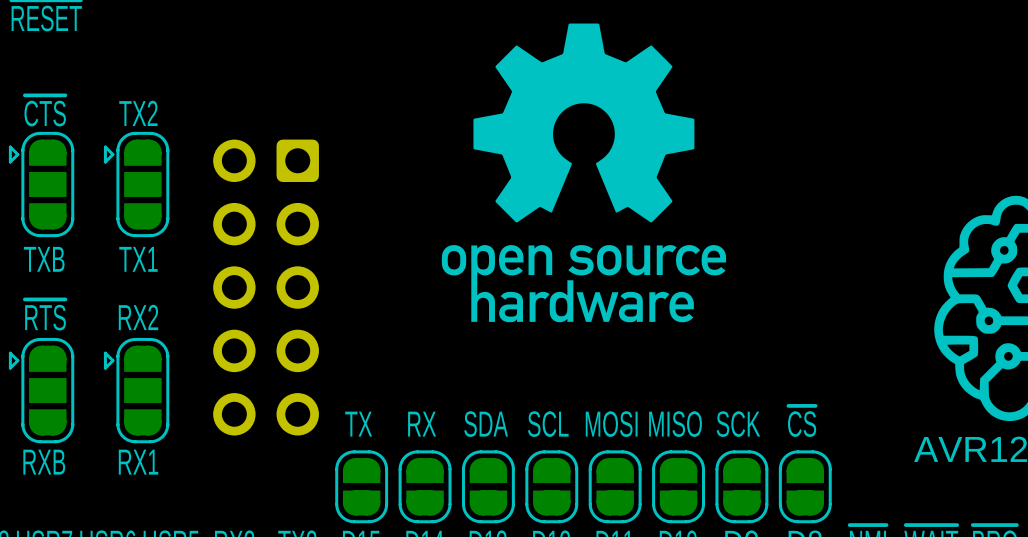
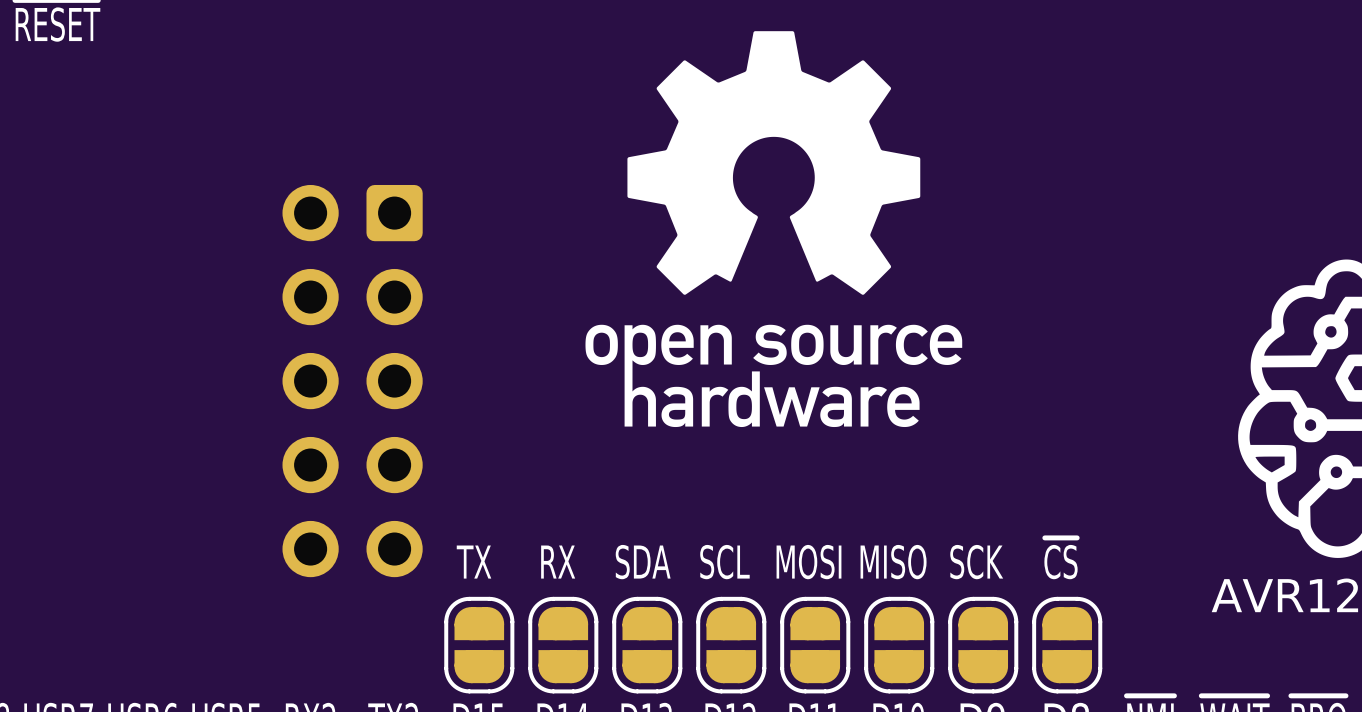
text: ~{CTS} (45, 110) -> none
text: TX2 (138, 113) -> none
part: (41, 184) -> none
part: (136, 184) -> none
text: TXB (44, 259) -> none
text: TX1 (138, 259) -> none
text: ~{RTS} (45, 314) -> none
text: RX2 (138, 317) -> none
part: (41, 390) -> none
part: (136, 390) -> none
text: RXB (44, 462) -> none
text: RX1 (138, 462) -> none

